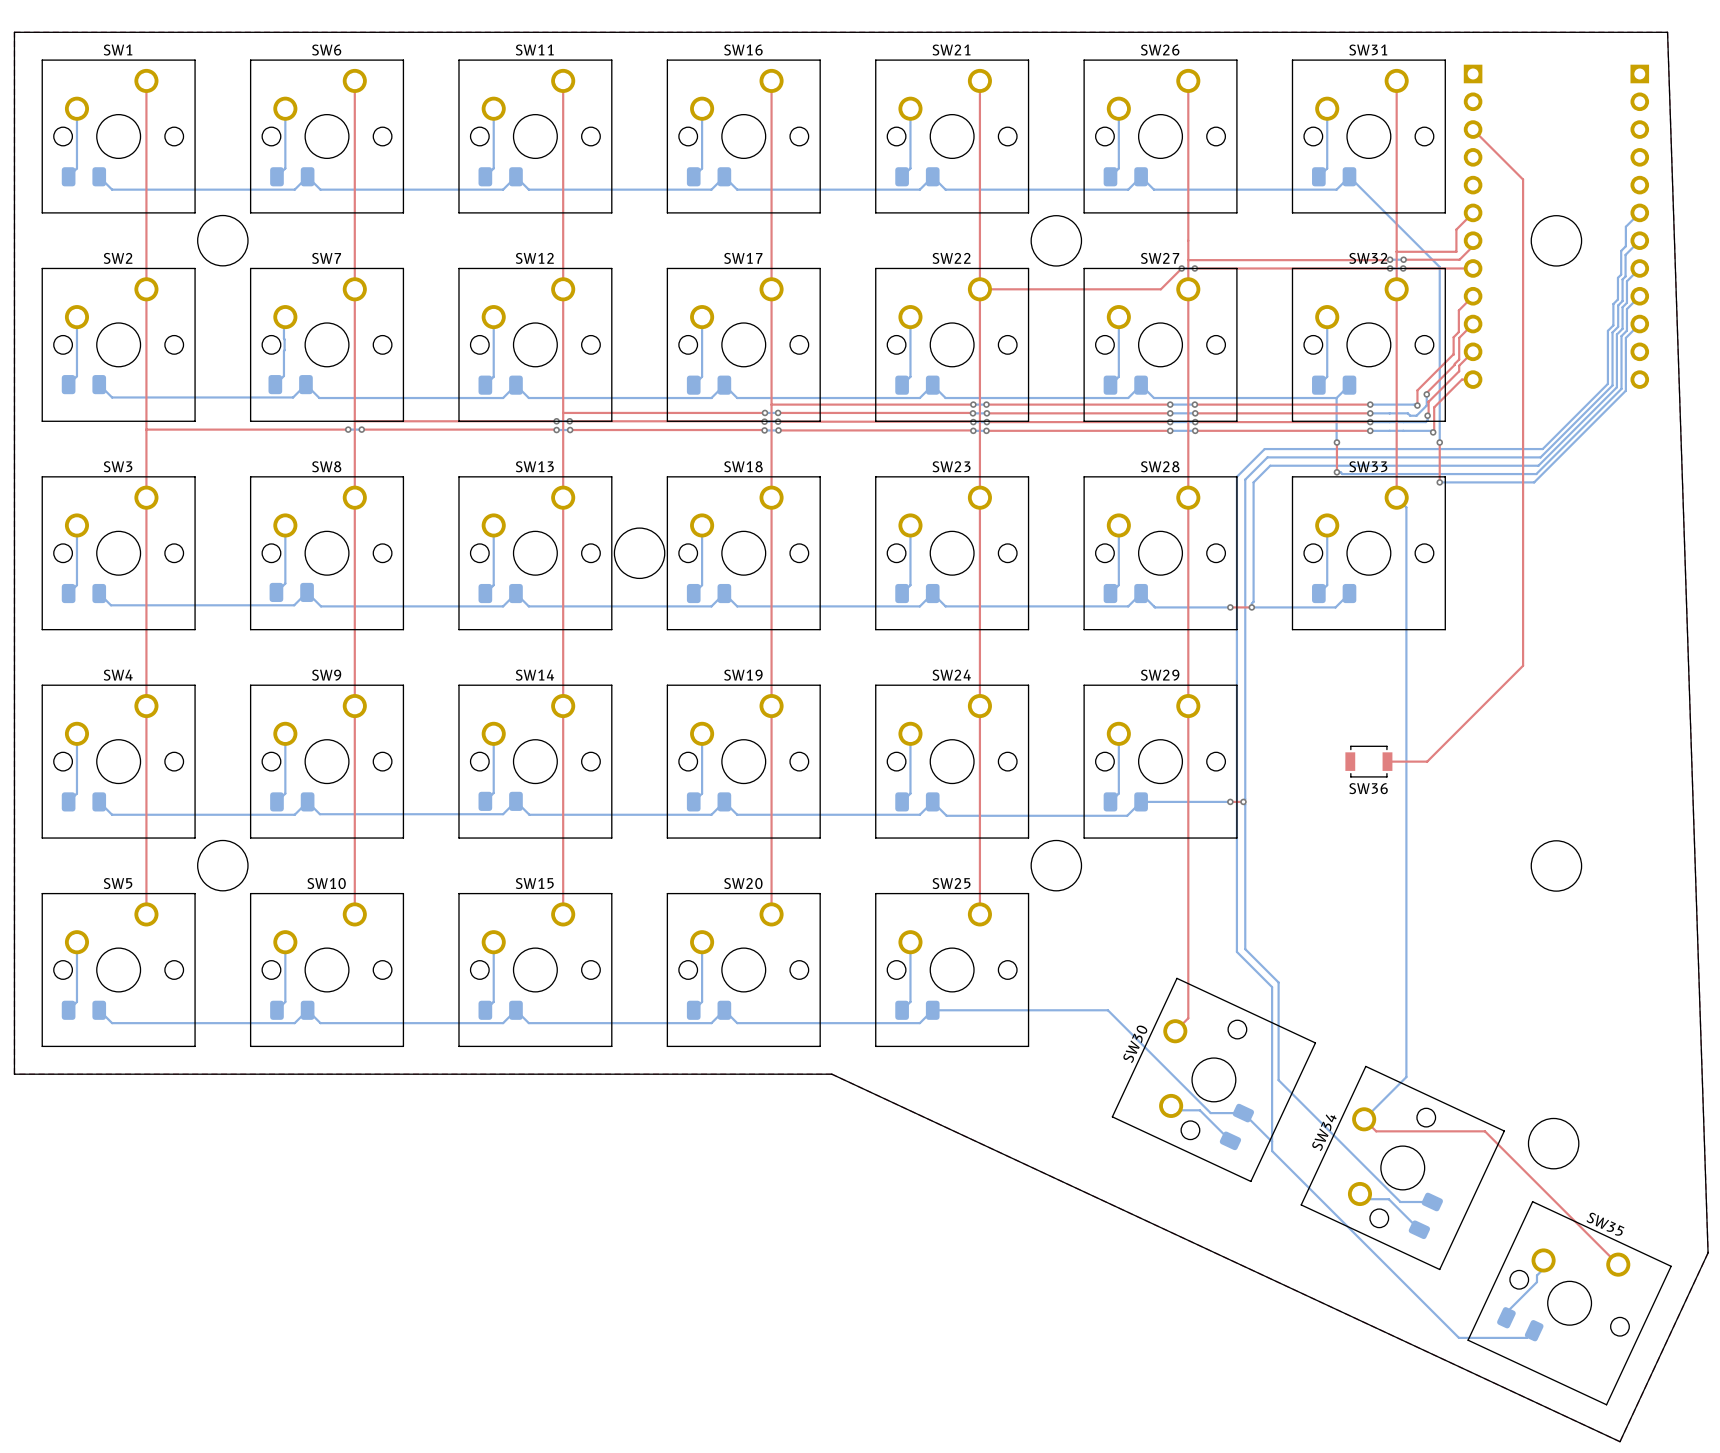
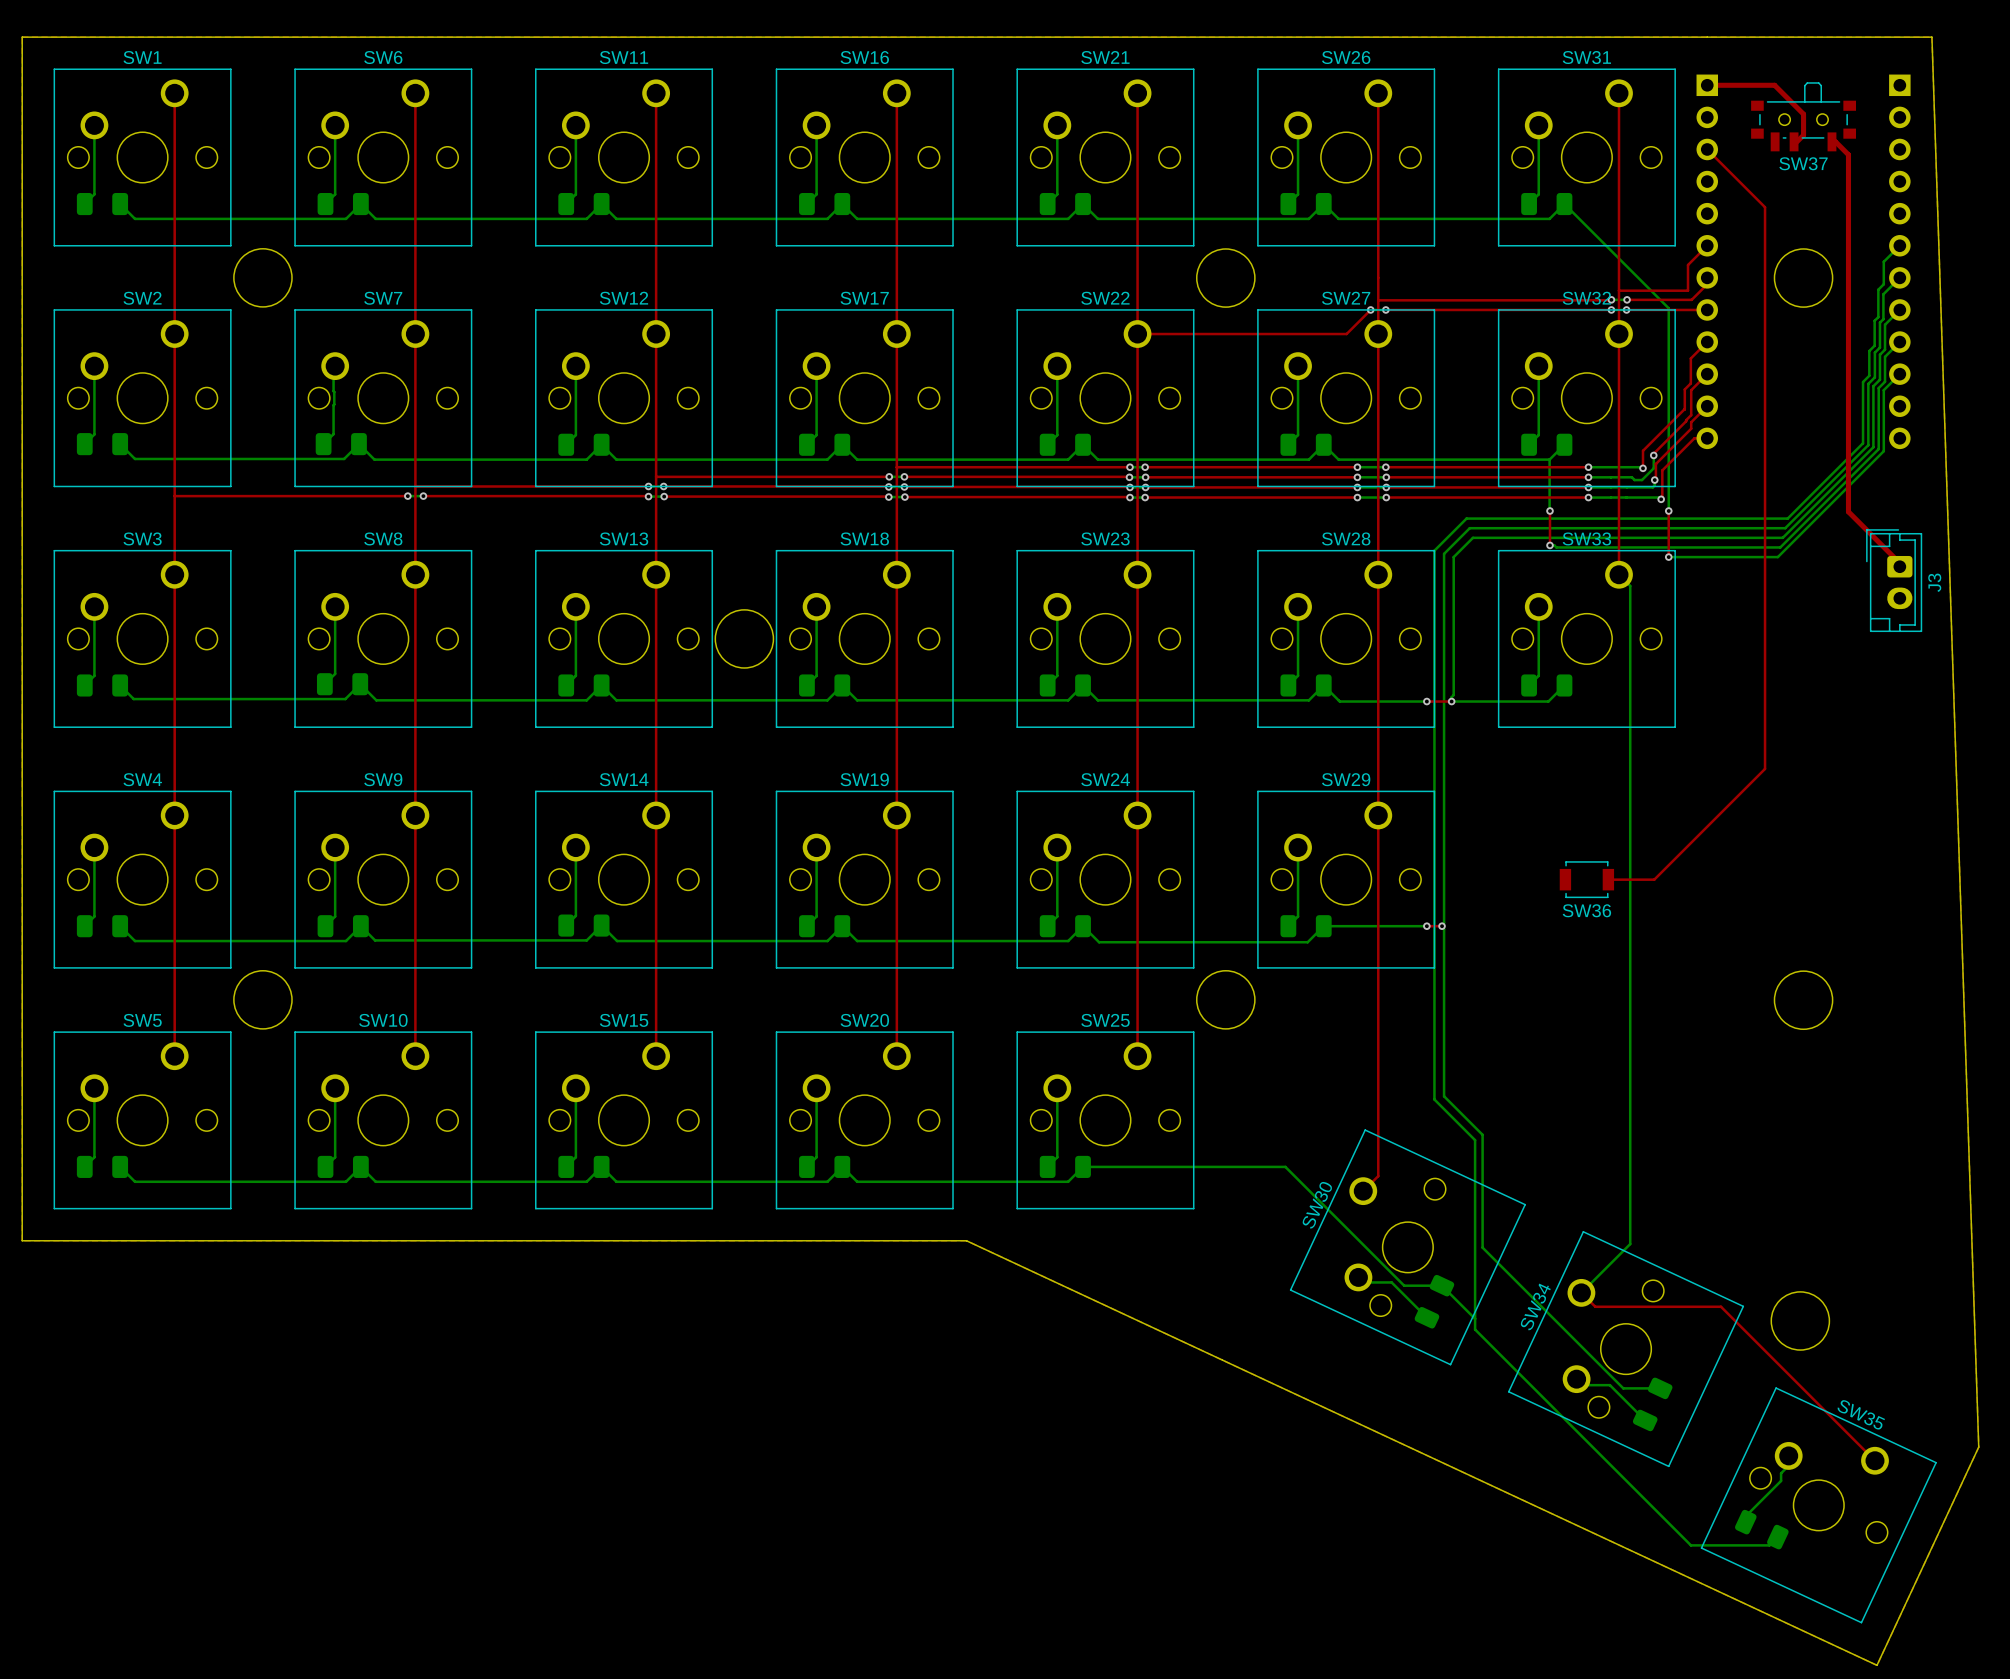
top track: none -> (1707, 85) (1774, 85) (1803, 114) (1803, 135) (1796, 141)
SW37: none -> (1803, 116)
top track: none -> (1831, 141) (1835, 141) (1848, 154) (1848, 511) (1899, 563) (1899, 566)
J3: none -> (1894, 580)

